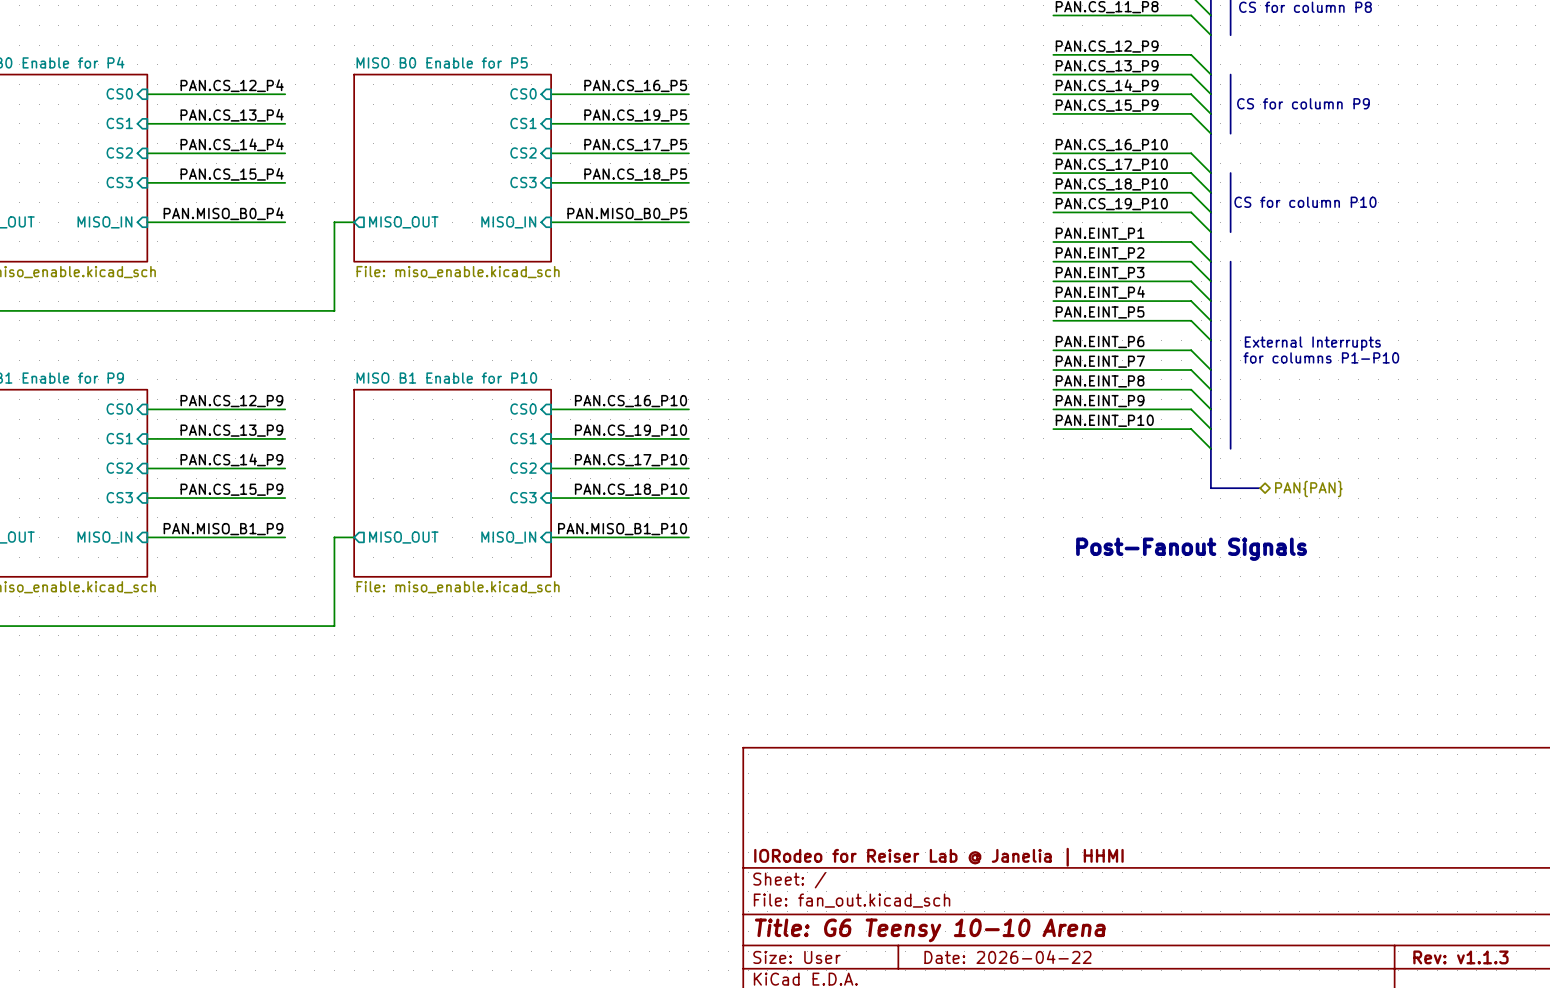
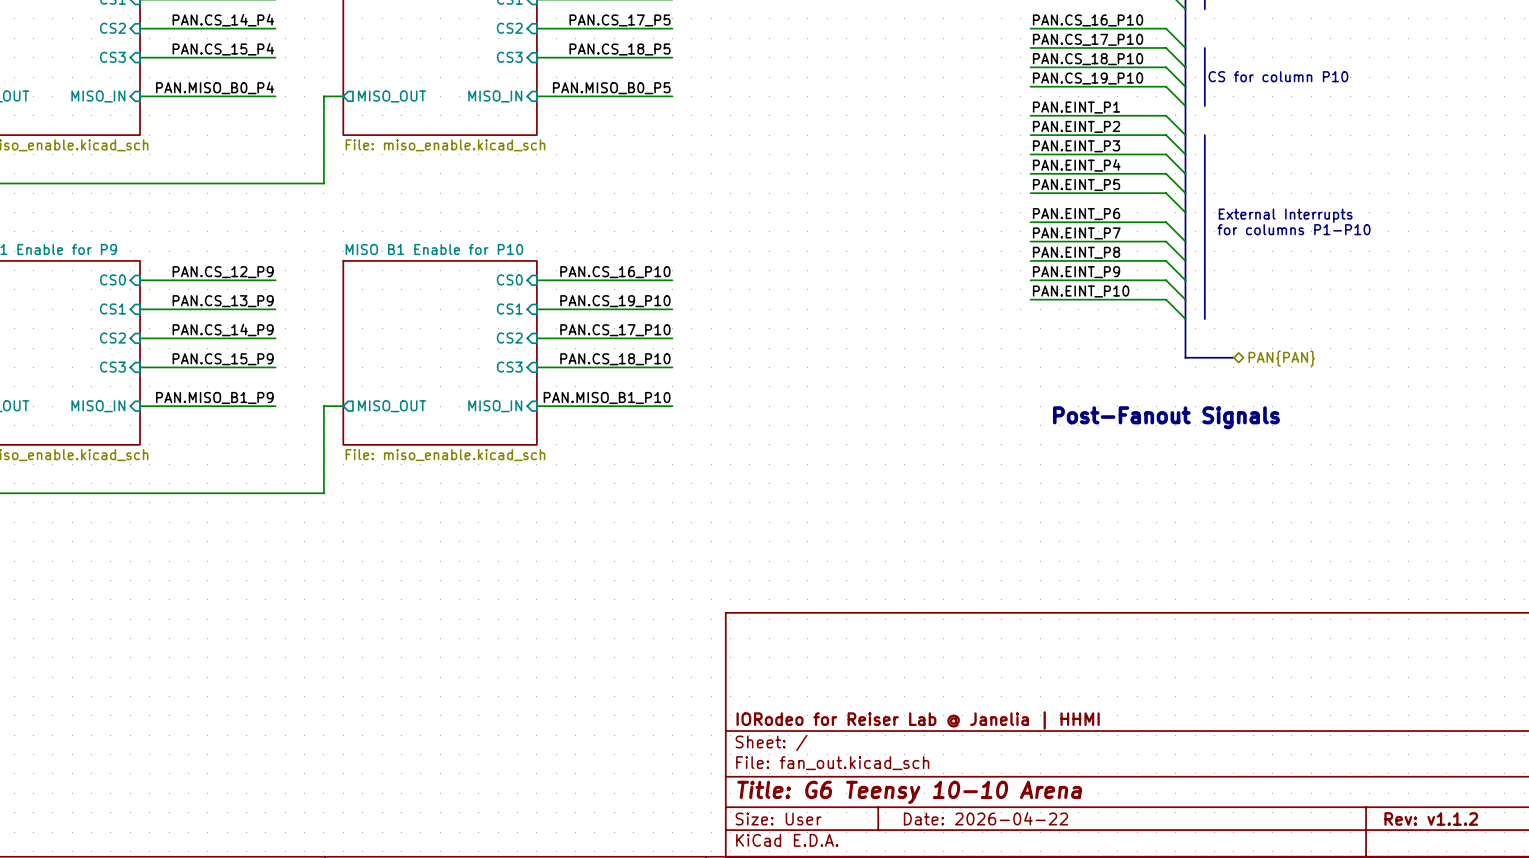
title block: Rev: v1.1.3 (1460, 957) -> Rev: v1.1.2 (1431, 818)

